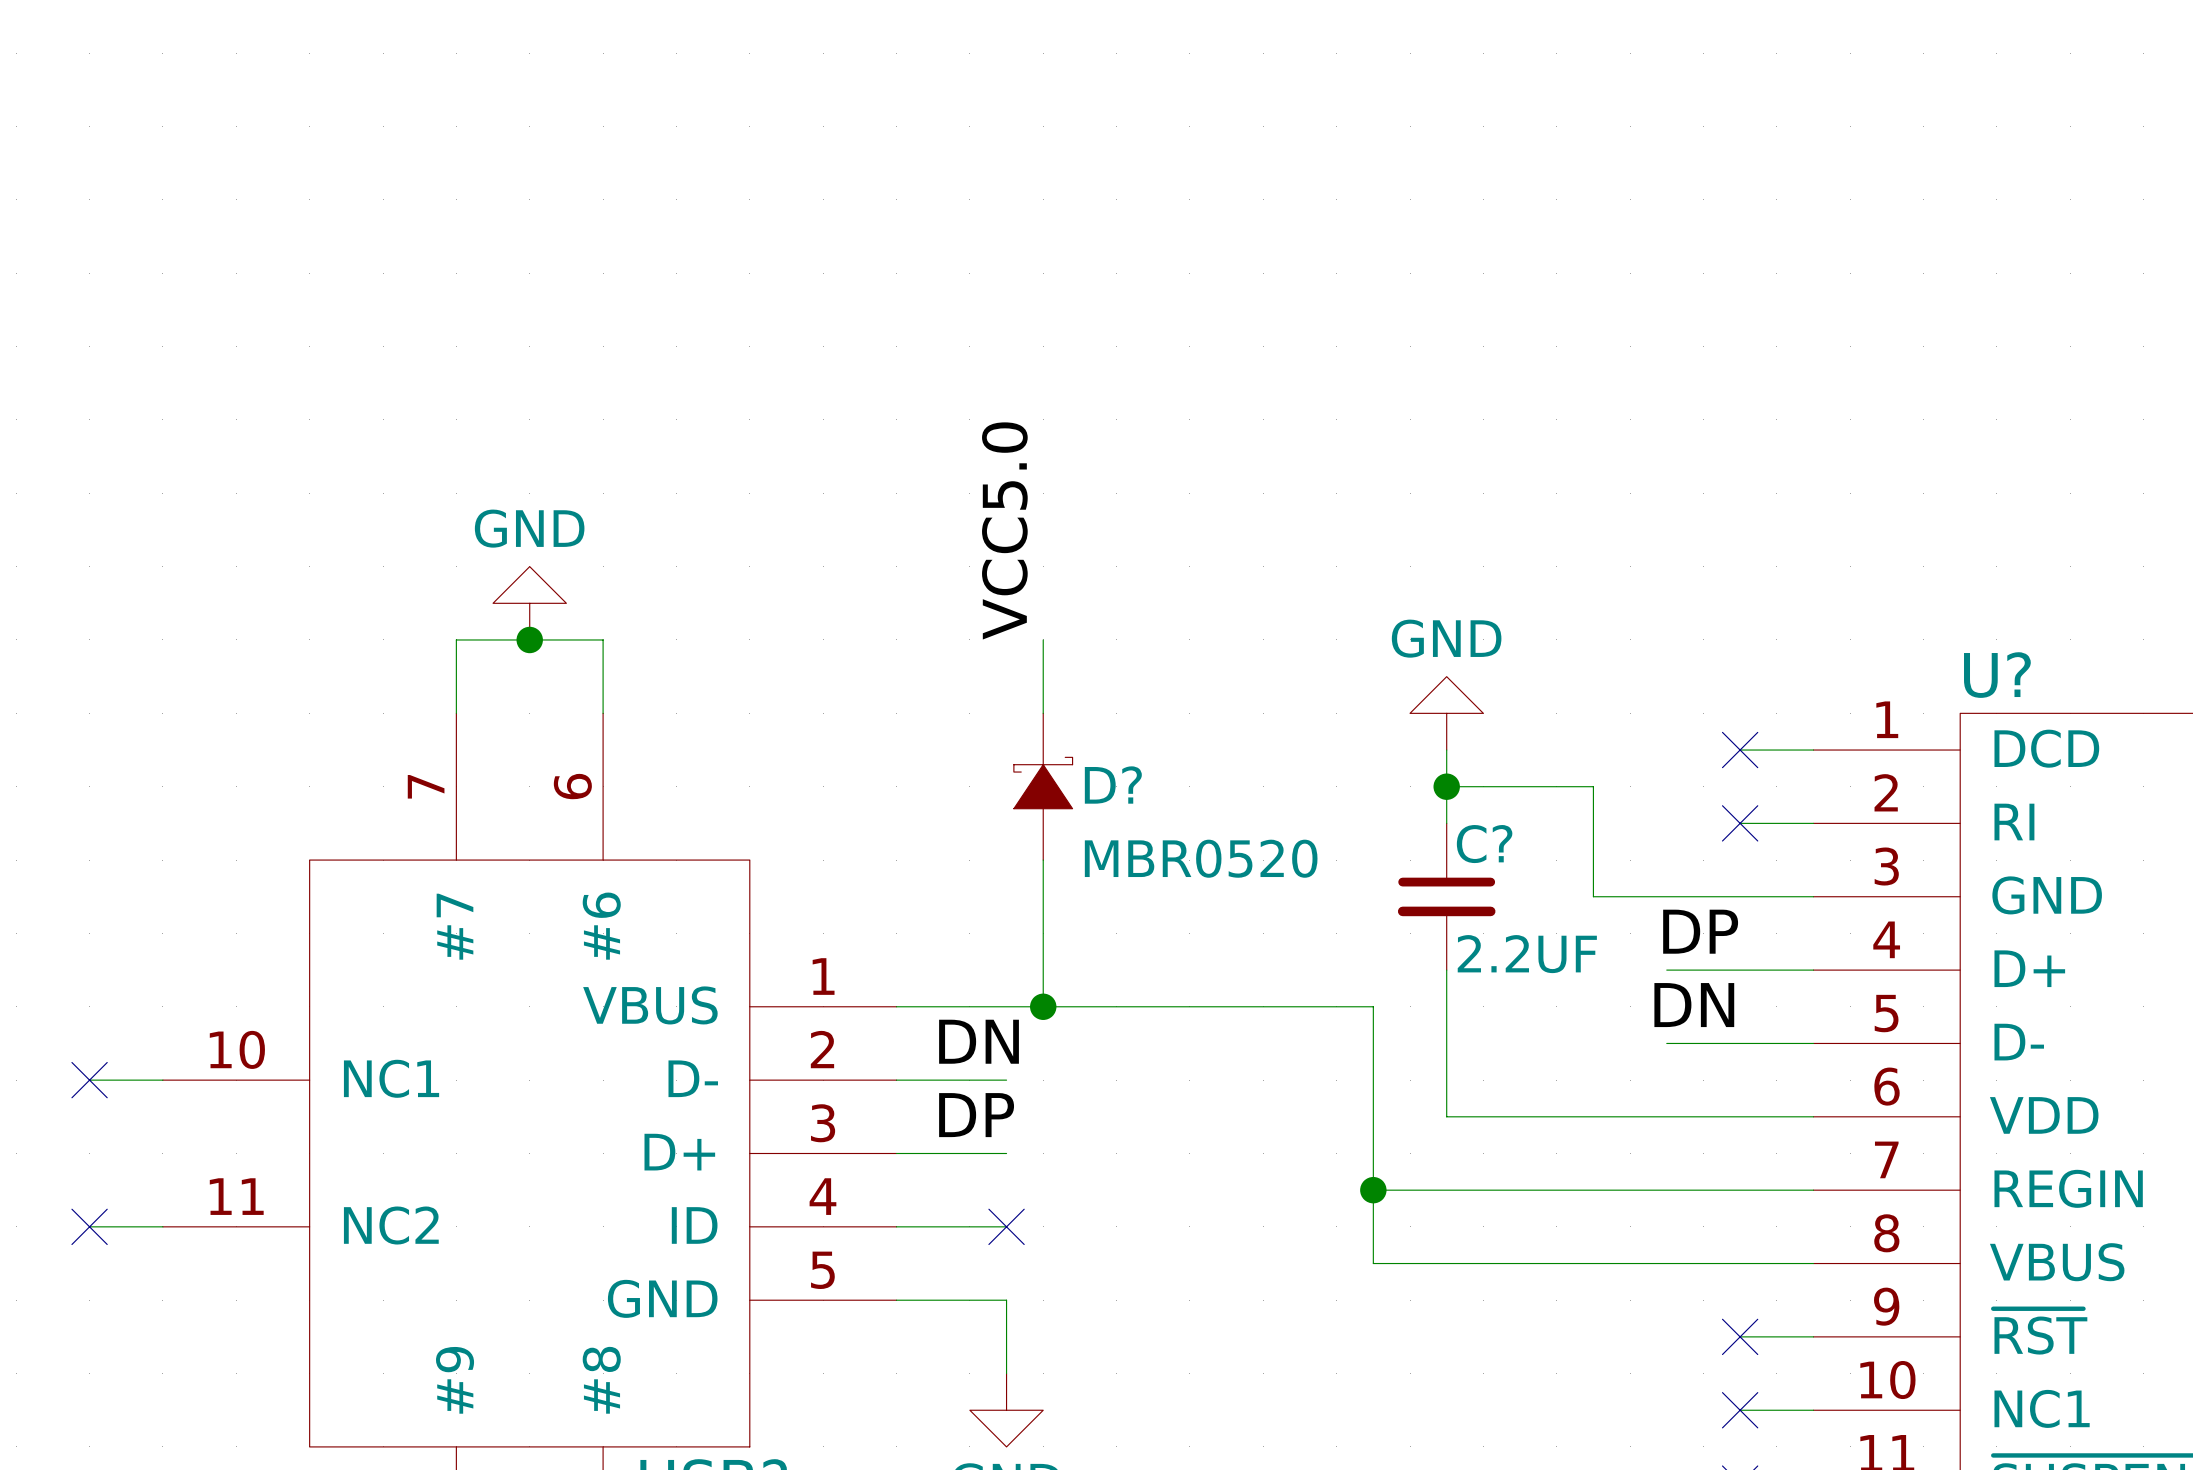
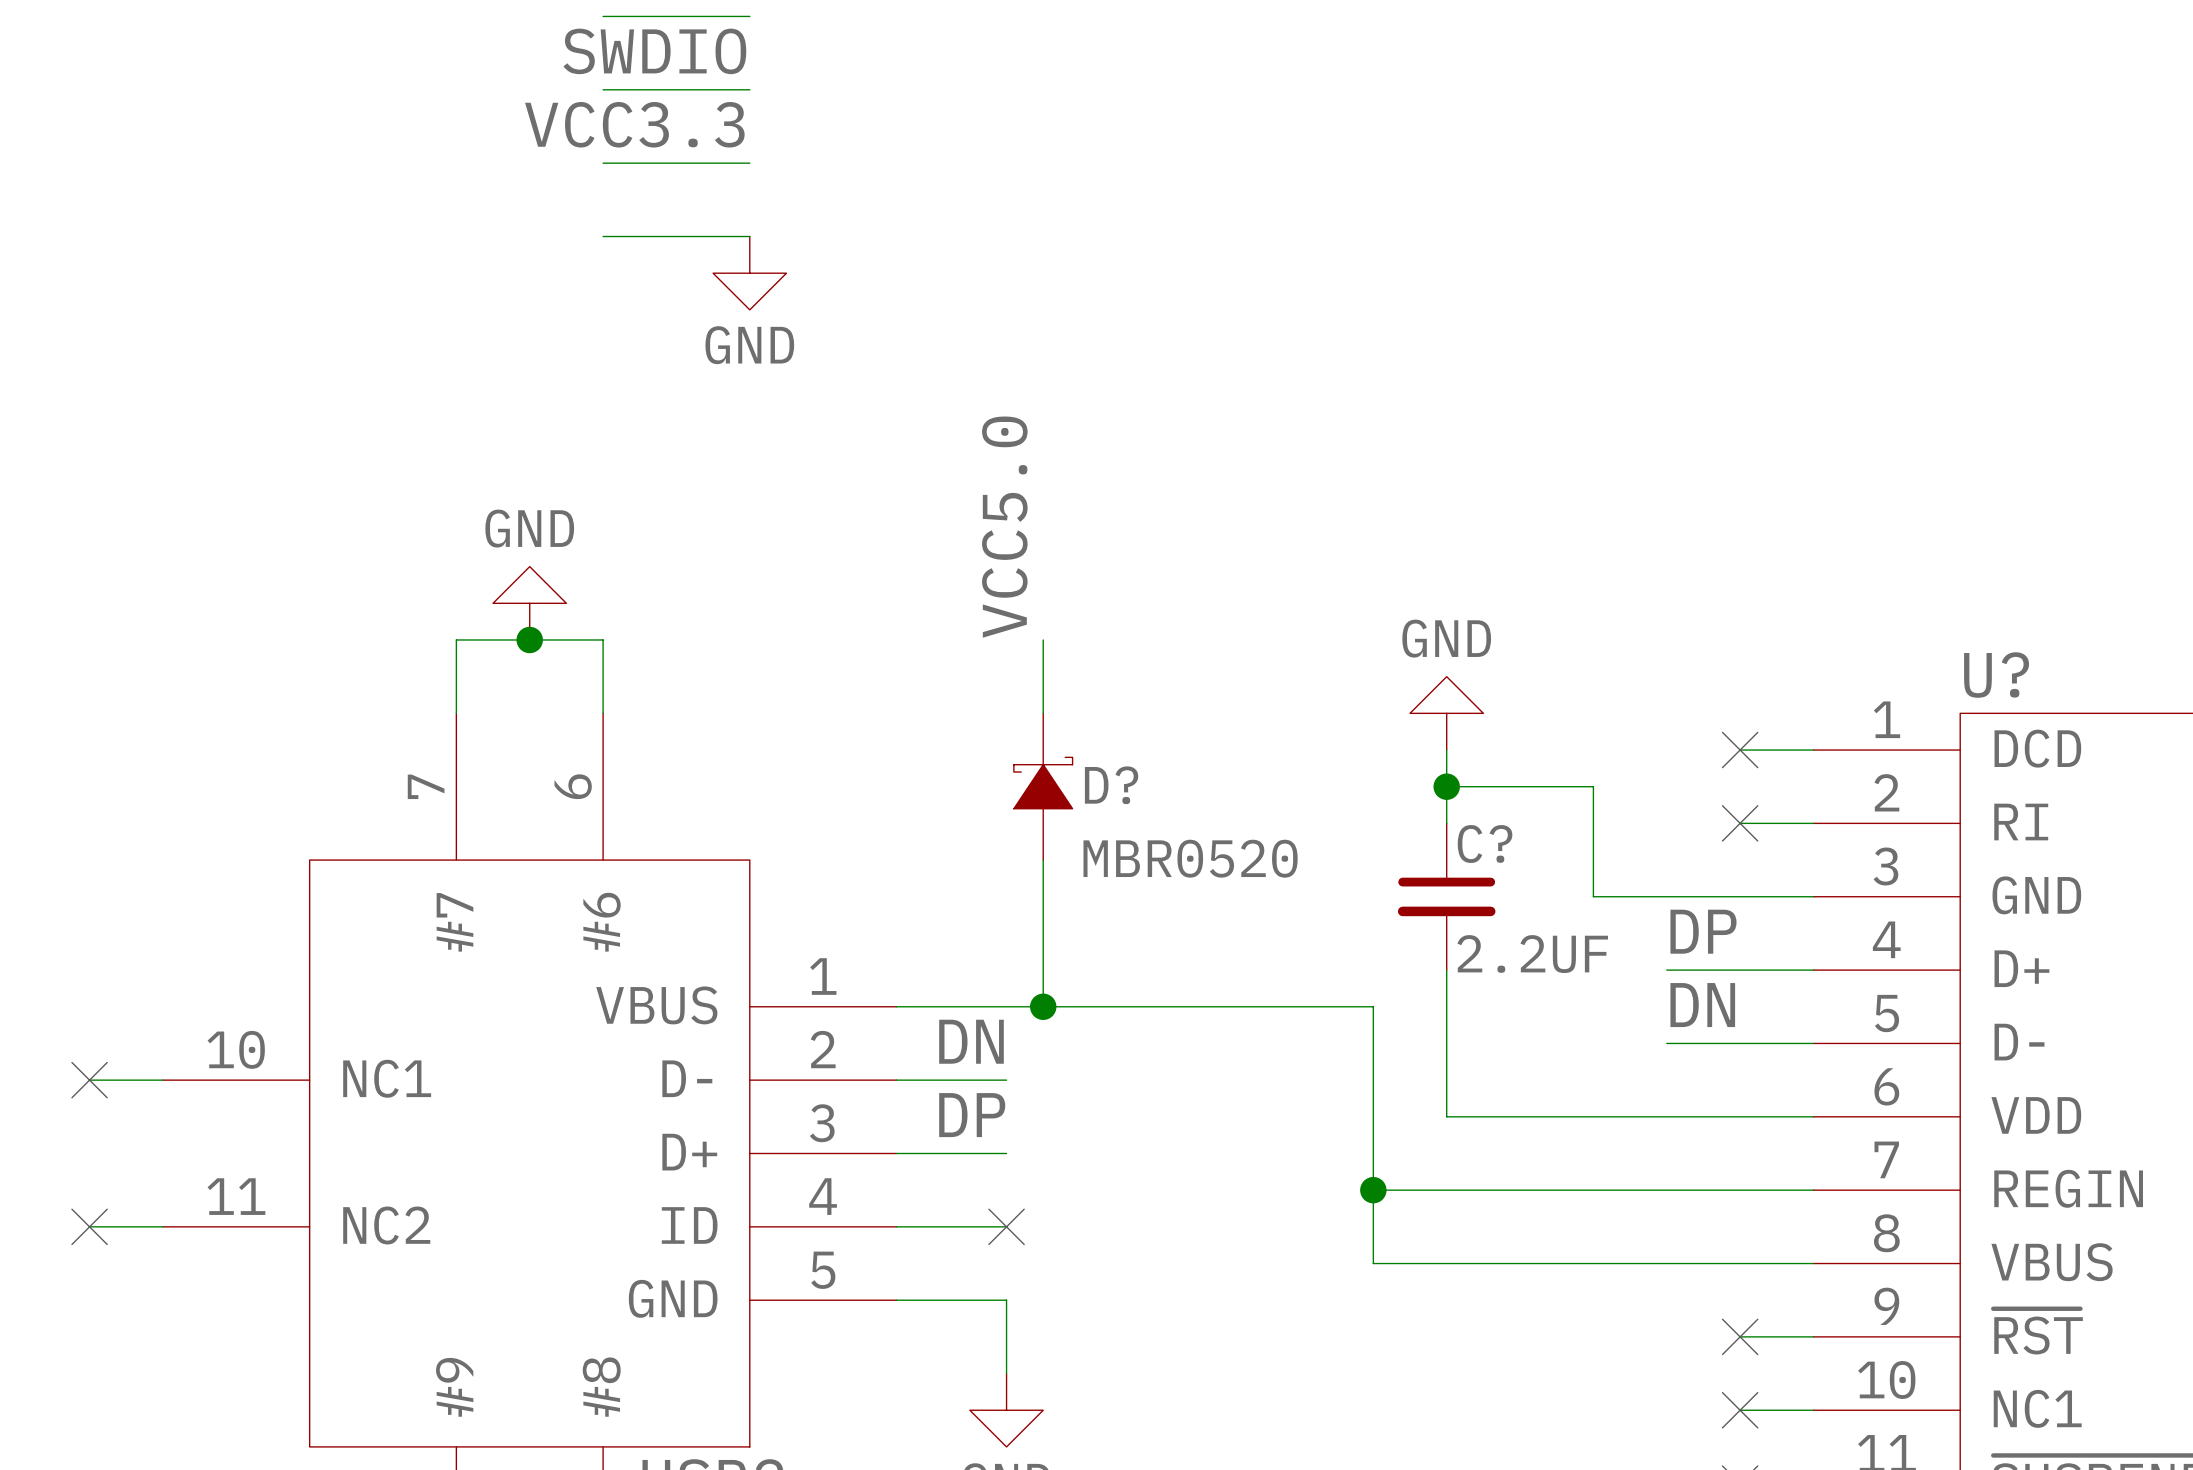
wire: none -> (603, 16) (749, 16)
label: none -> SWDIO (654, 51)
wire: none -> (603, 89) (749, 89)
label: none -> VCC3.3 (634, 124)
wire: none -> (603, 163) (749, 163)
wire: none -> (603, 236) (749, 236)
power symbol: none -> GND (749, 273)

